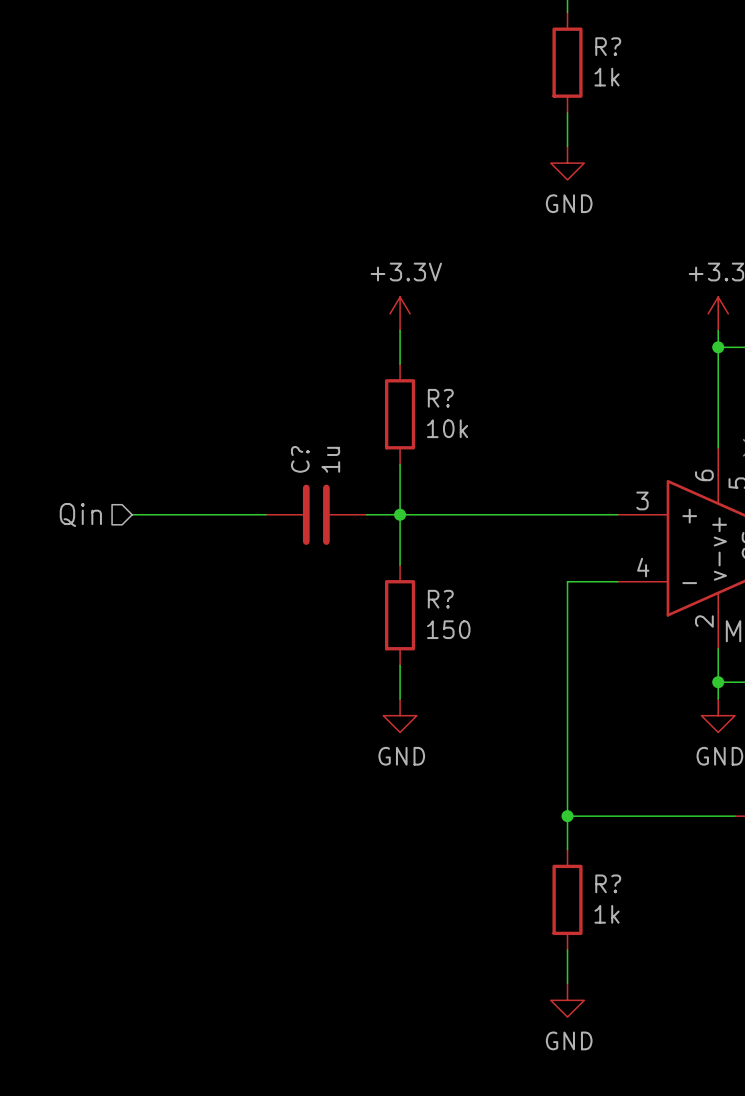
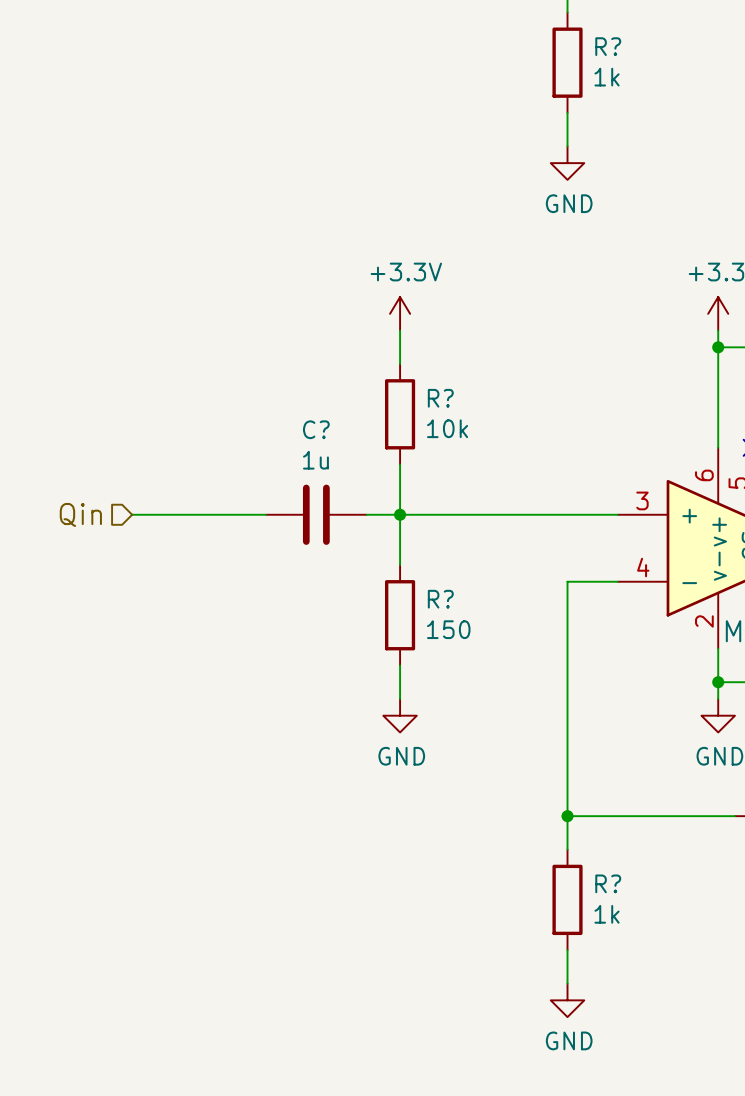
C? name rotation: 0° (300, 459) -> 90° clockwise (316, 429)
C? value rotation: 0° (330, 459) -> 90° clockwise (315, 460)

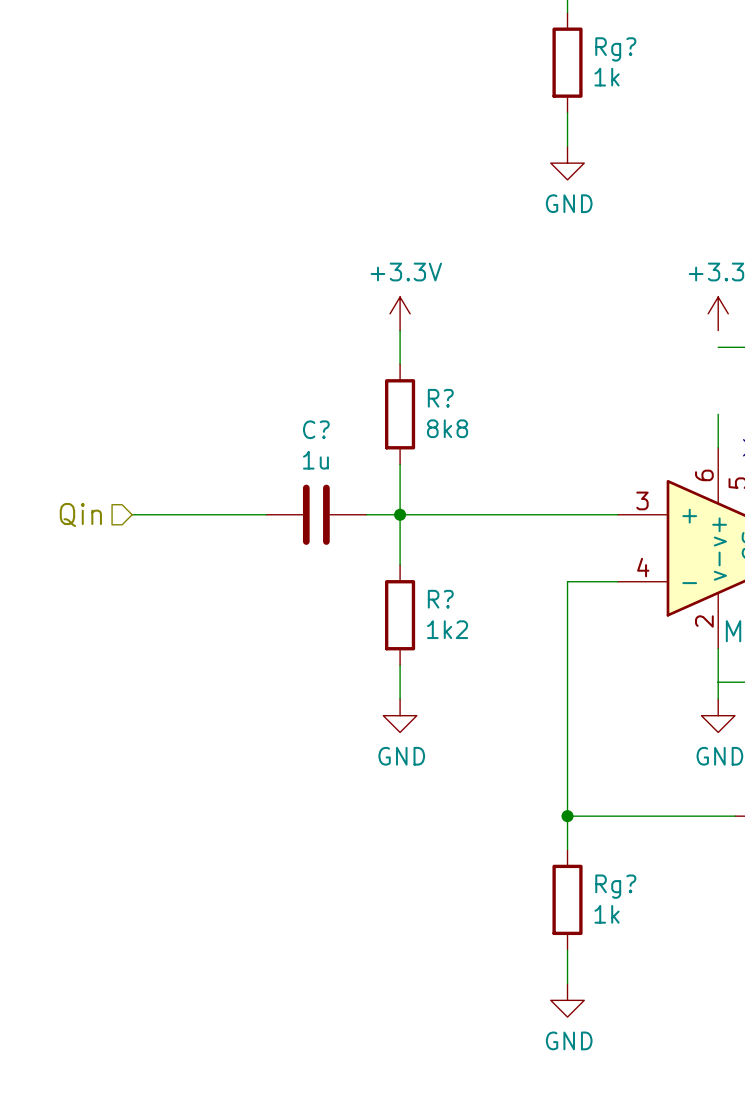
R? name: R? (608, 46) -> Rg? (615, 49)
wire: (718, 330) (718, 414) -> none
junction: (718, 347) -> none
R? value: 10k (447, 428) -> 8k8 (447, 428)
R? value: 150 (448, 629) -> 1k2 (447, 629)
junction: (718, 682) -> none
R? name: R? (608, 883) -> Rg? (615, 886)

